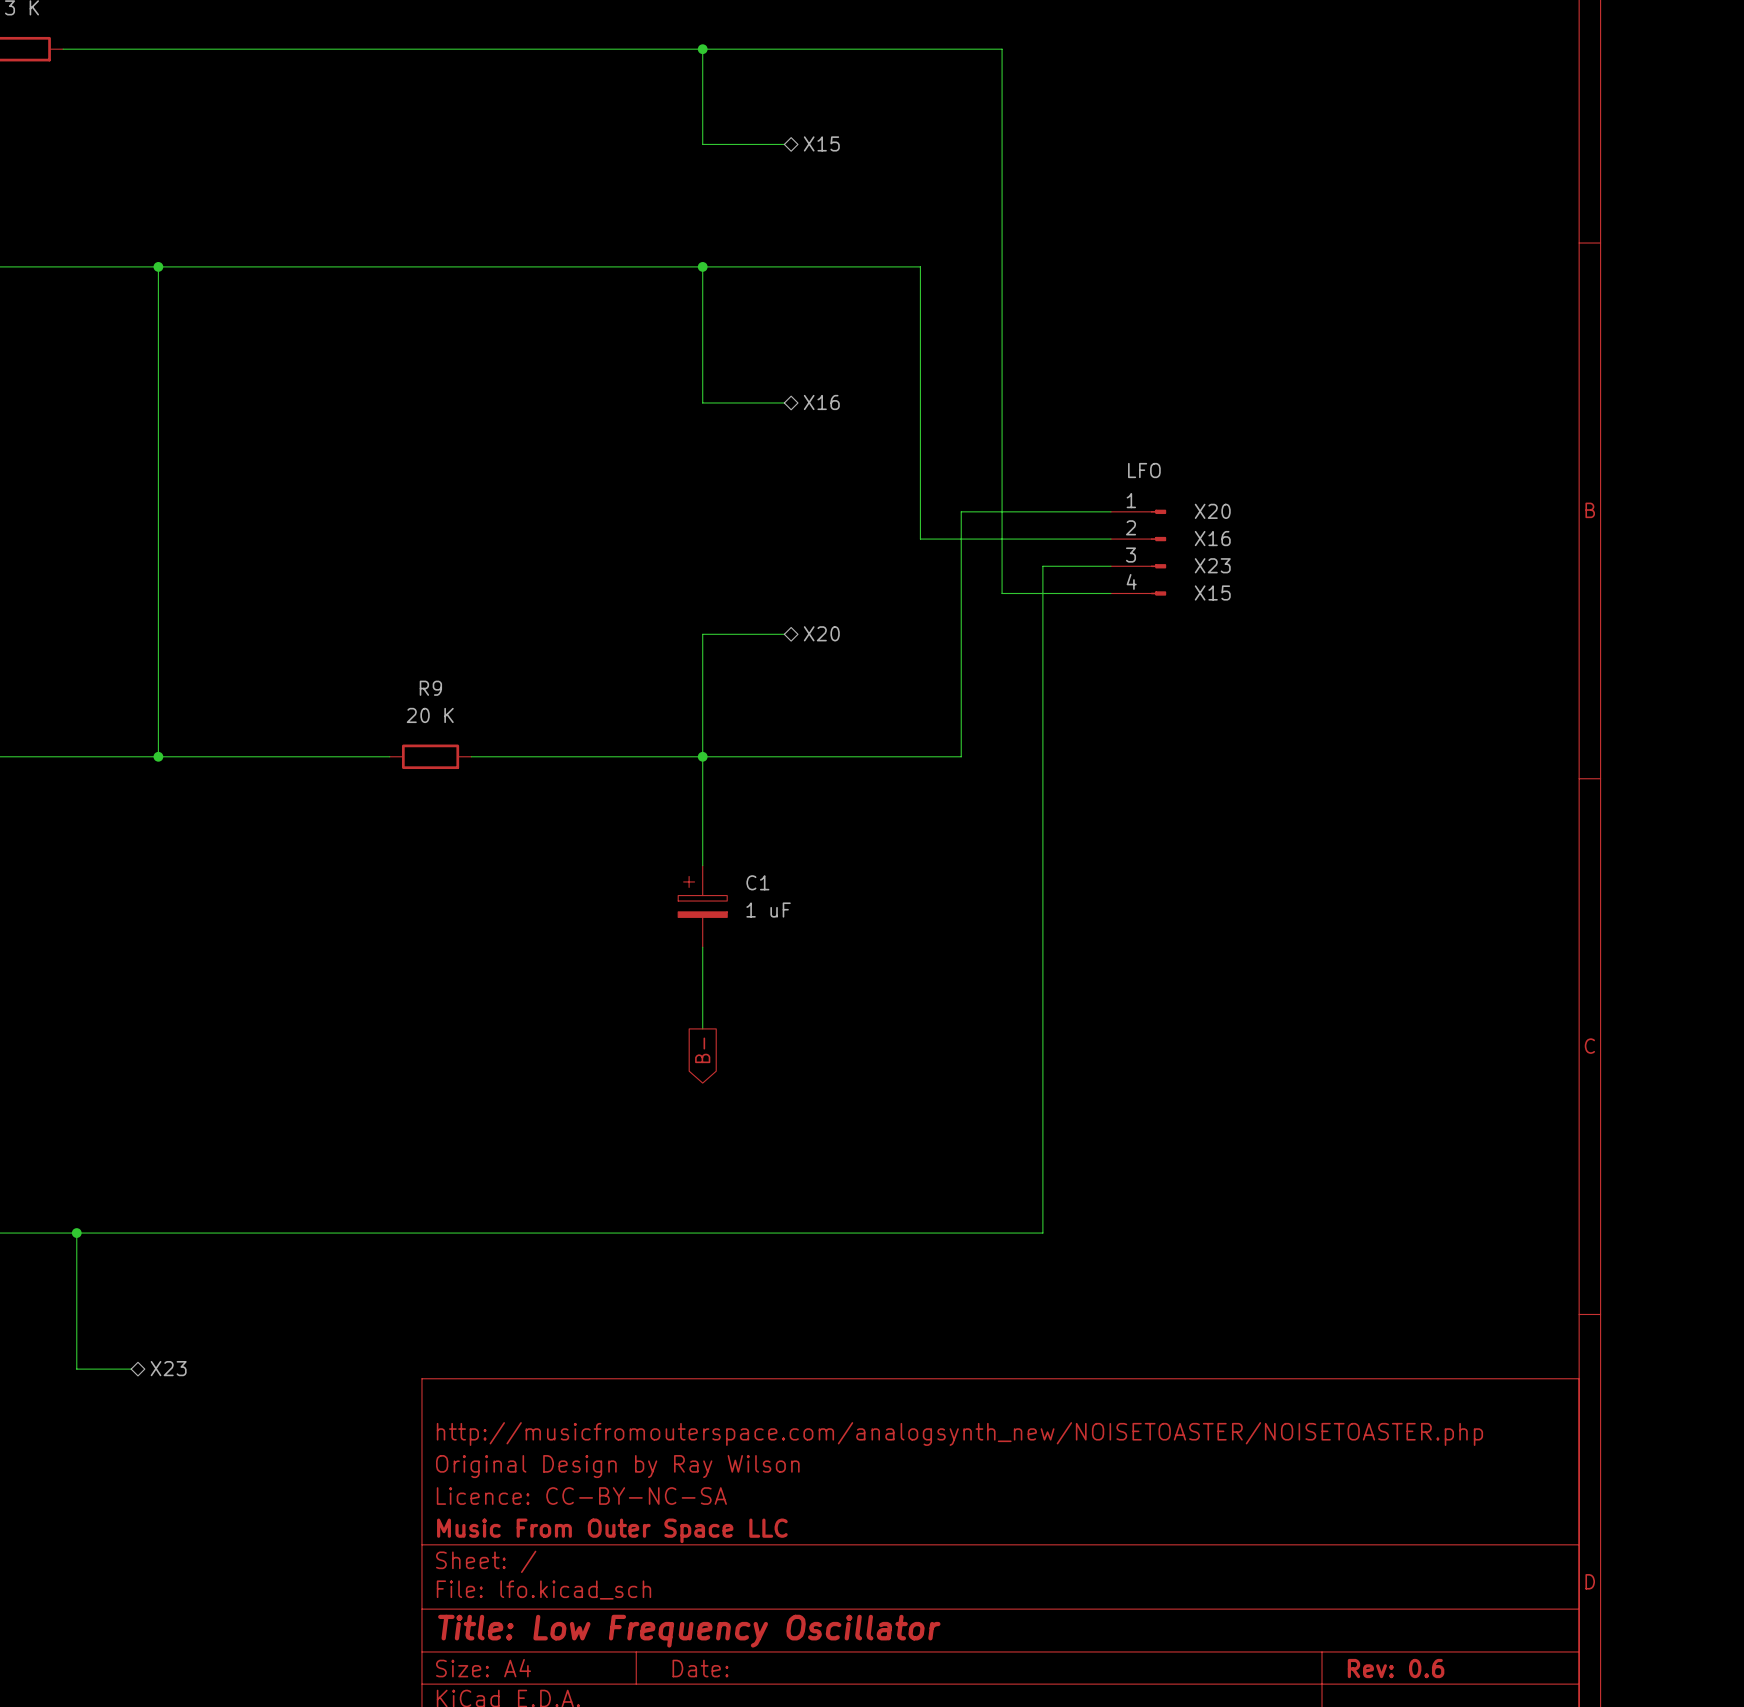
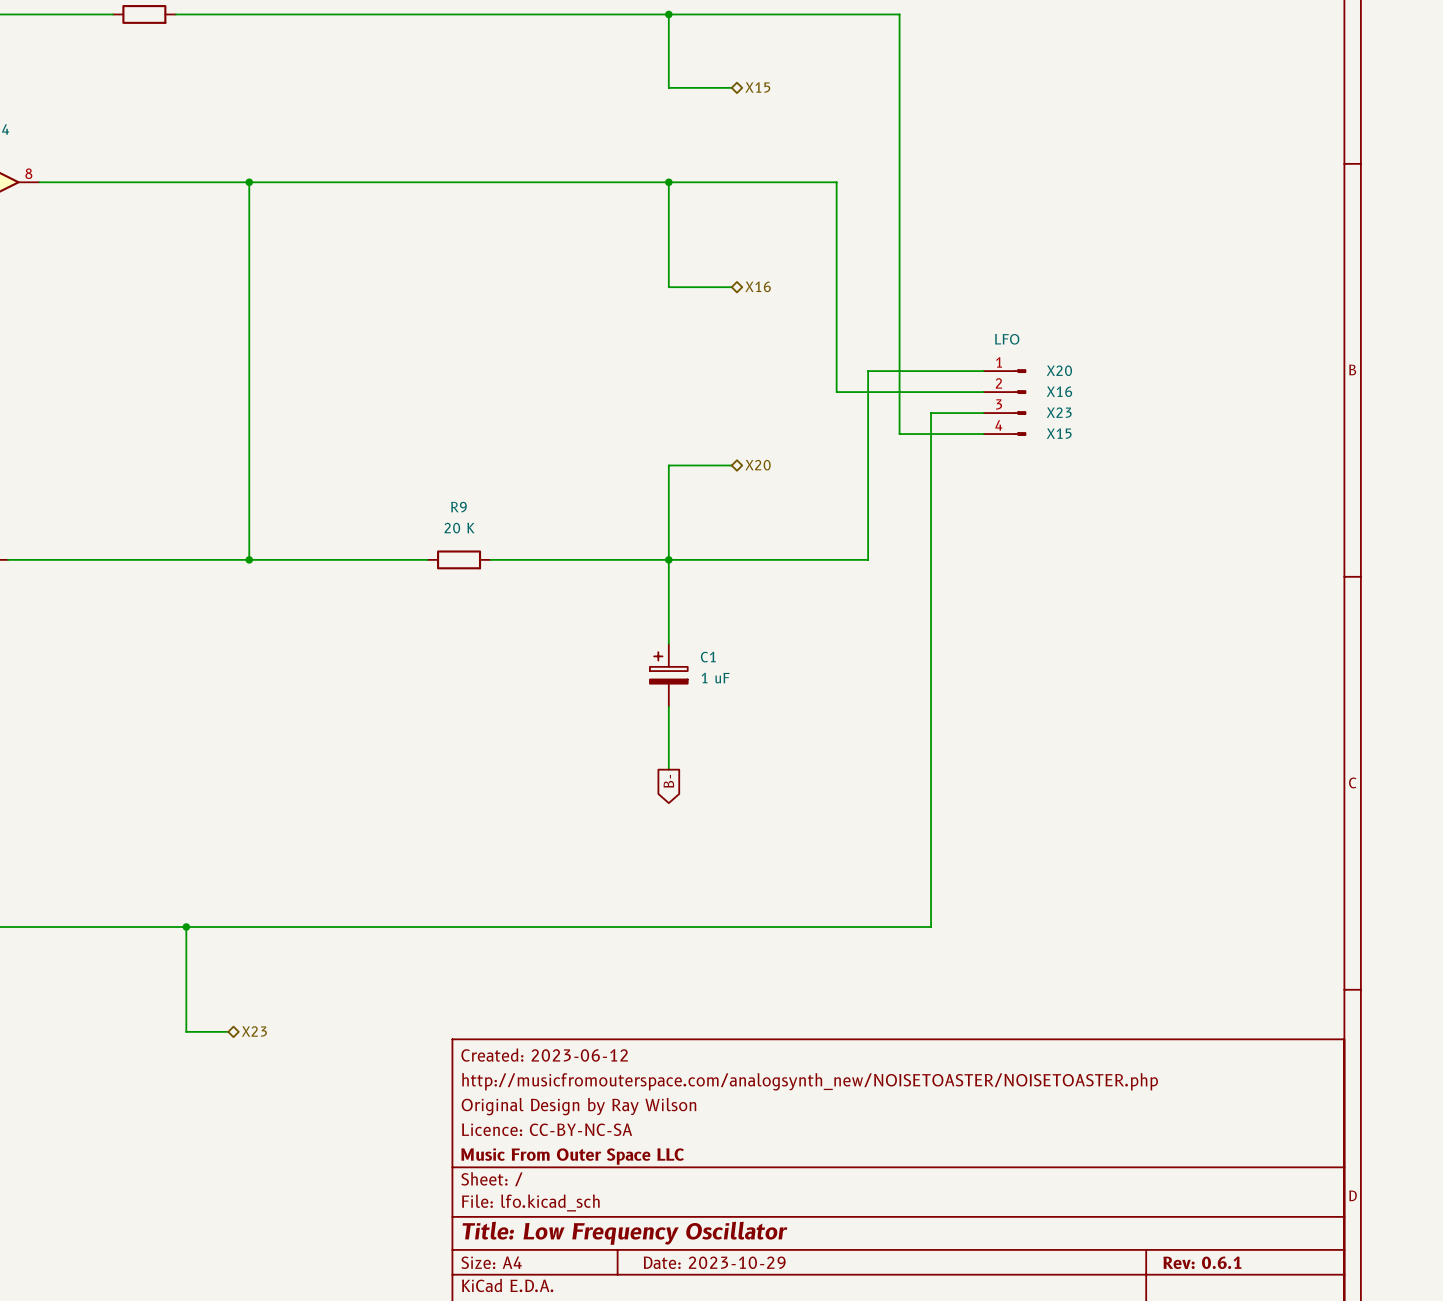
title block: none -> Created: 2023-06-12 (544, 1055)
title block: Date: (700, 1668) -> Date: 2023-10-29 (714, 1262)
title block: Rev: 0.6 (1396, 1668) -> Rev: 0.6.1 (1202, 1262)

